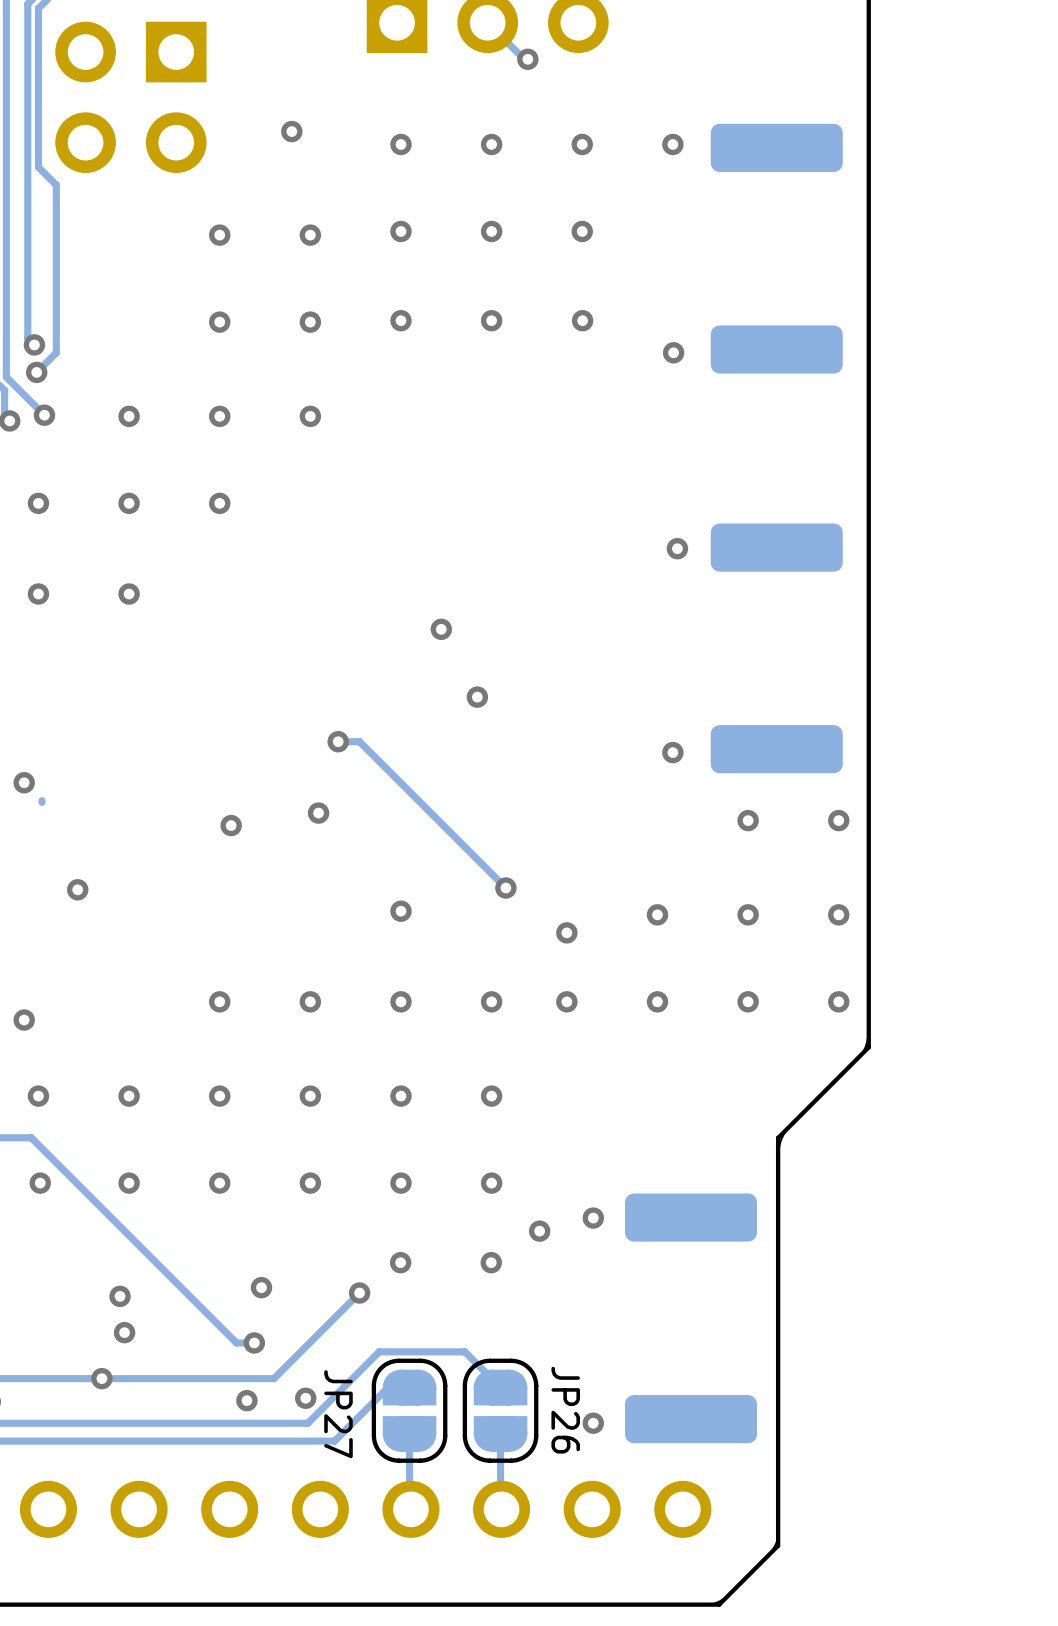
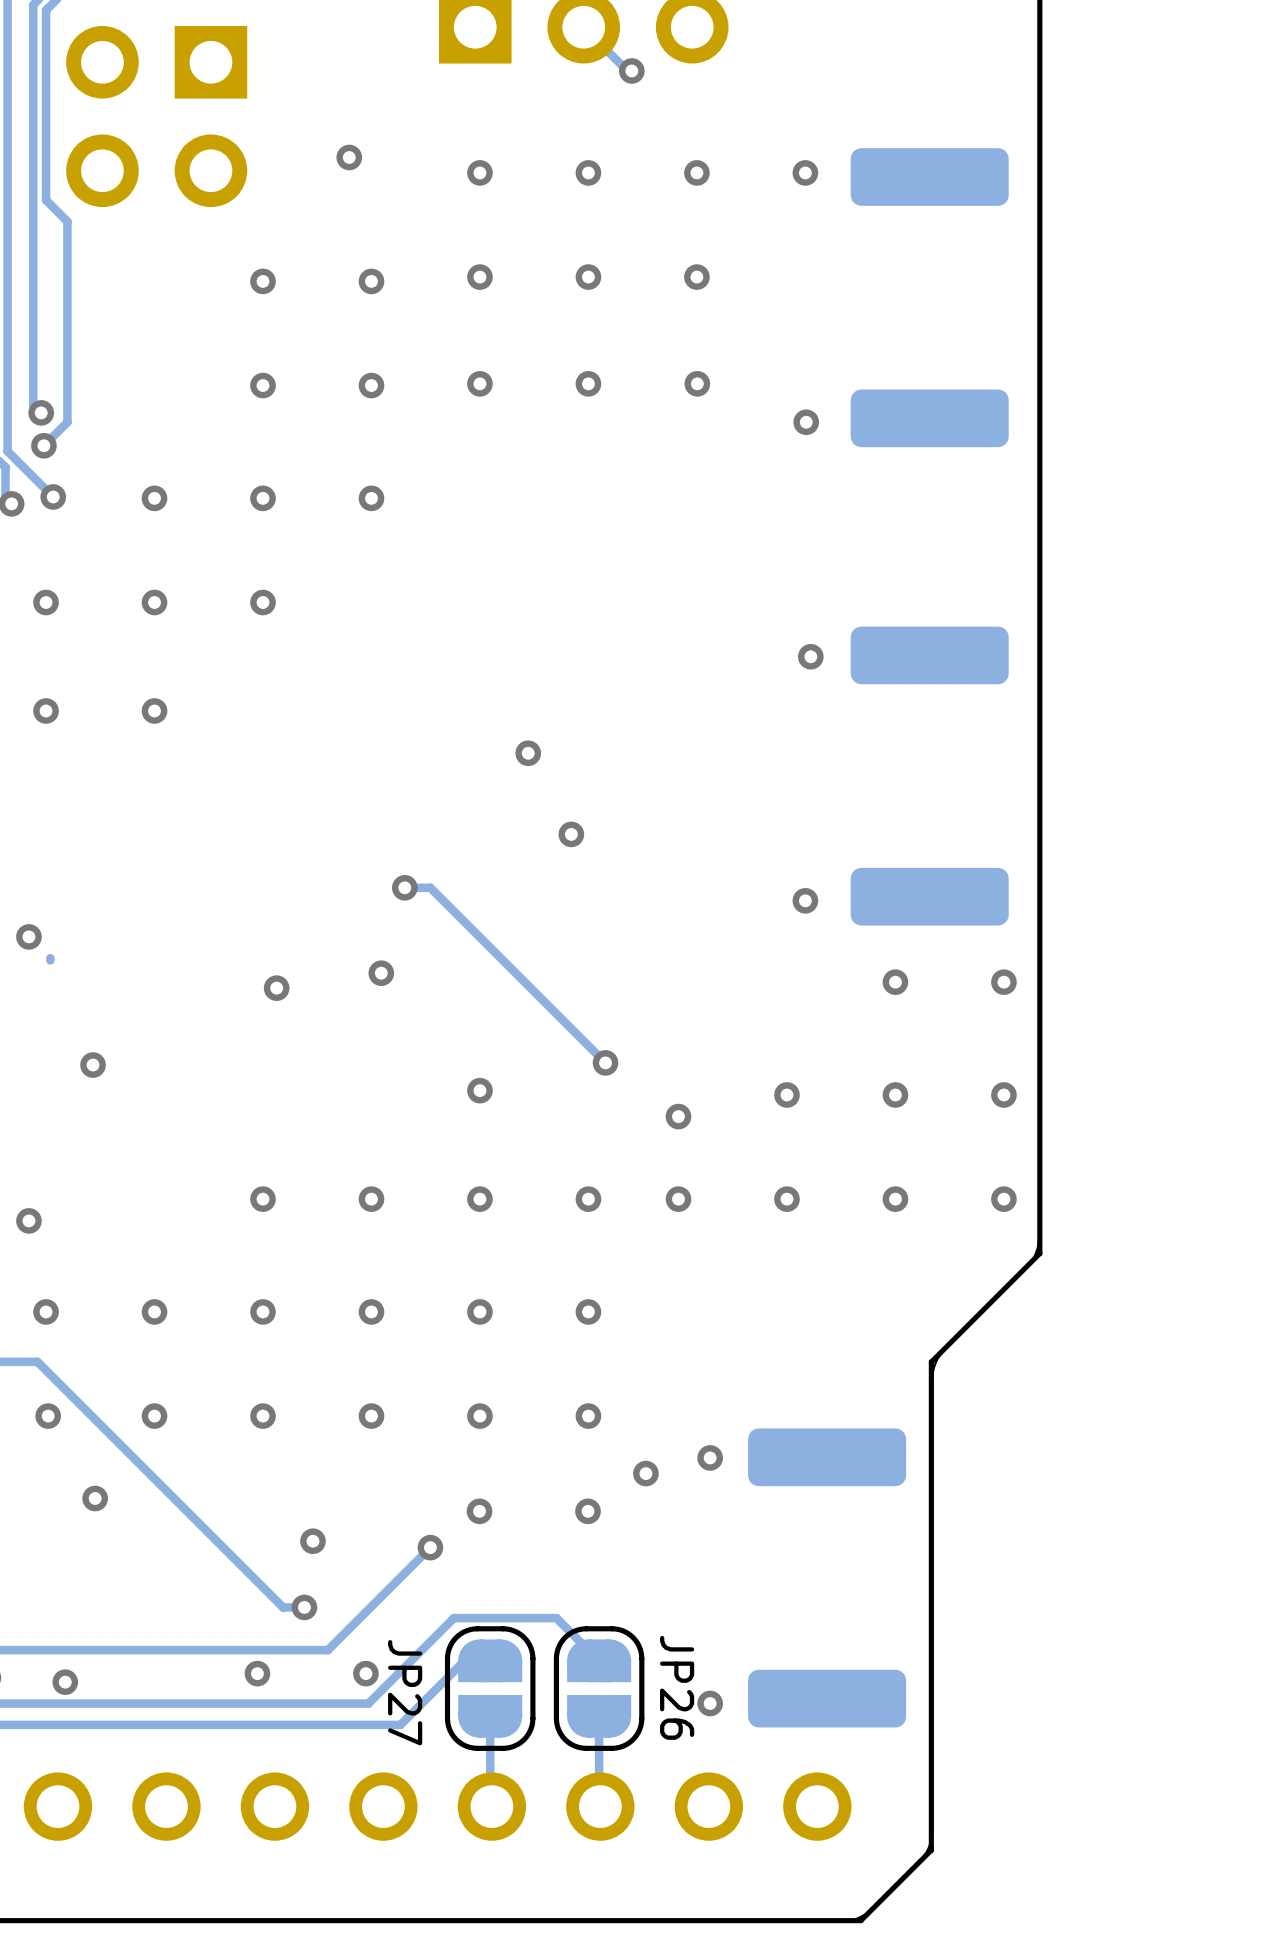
via: none -> (95, 1498)
via: (120, 1296) -> none
via: (124, 1332) -> none
via: (101, 1378) -> none
via position: (246, 1400) -> (257, 1673)
via: none -> (65, 1682)

